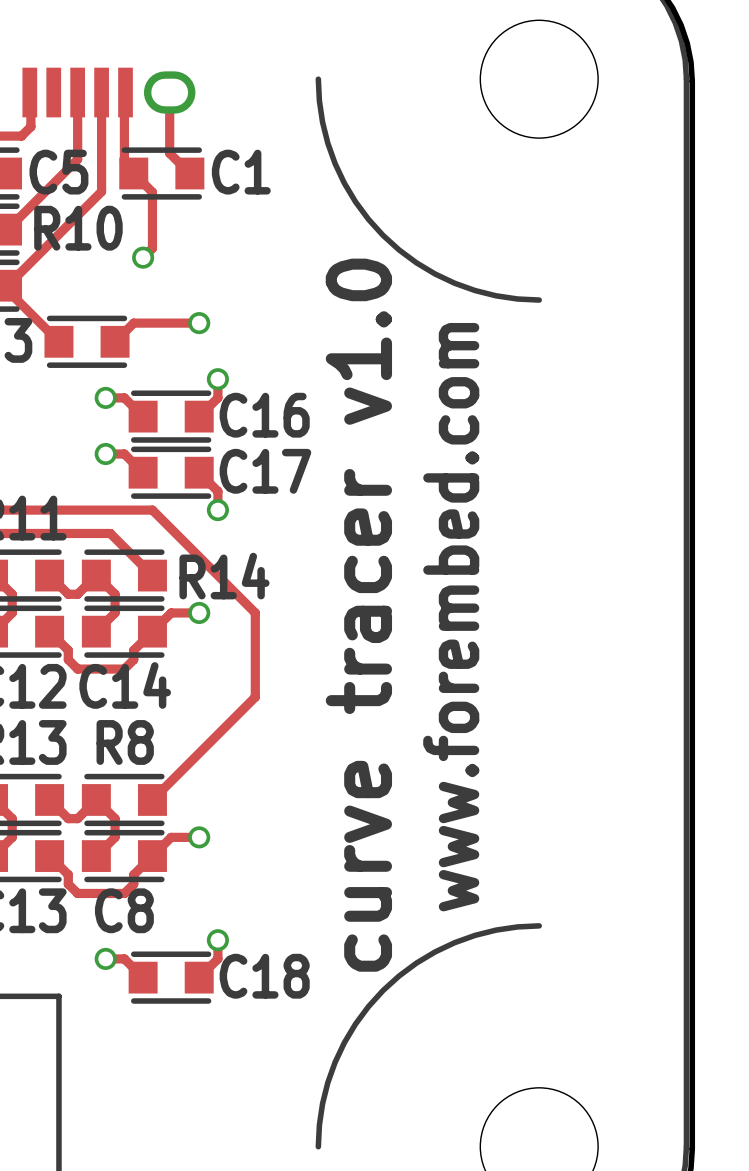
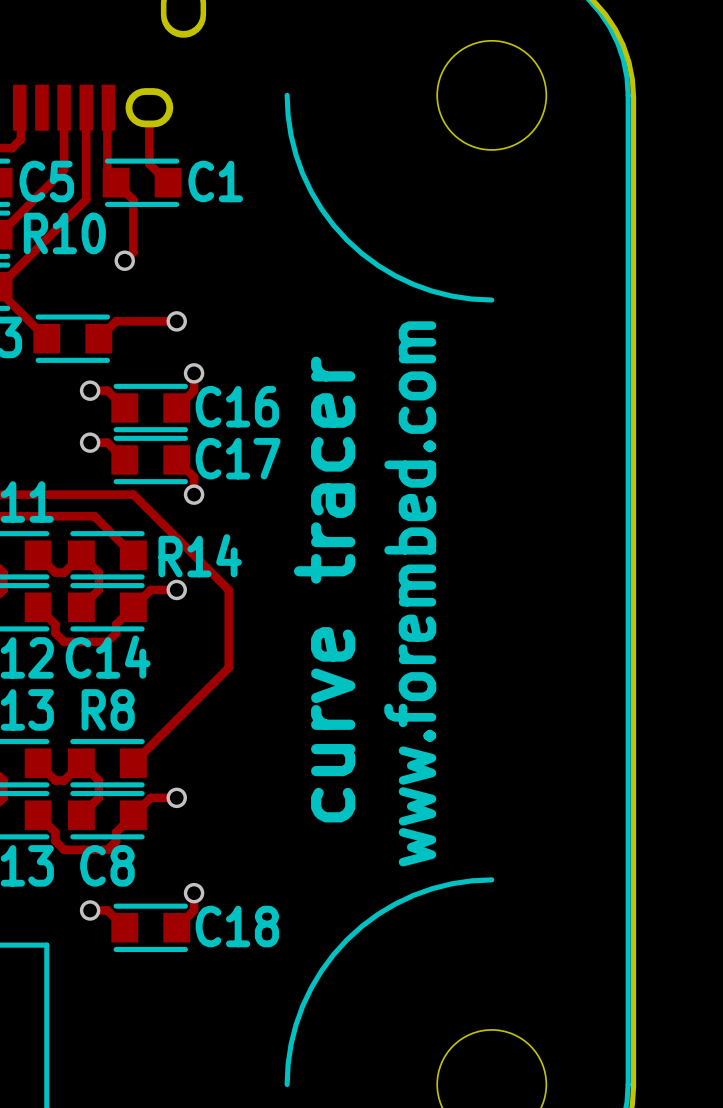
text: curve tracer v1.0 (358, 615) -> curve tracer (324, 589)

